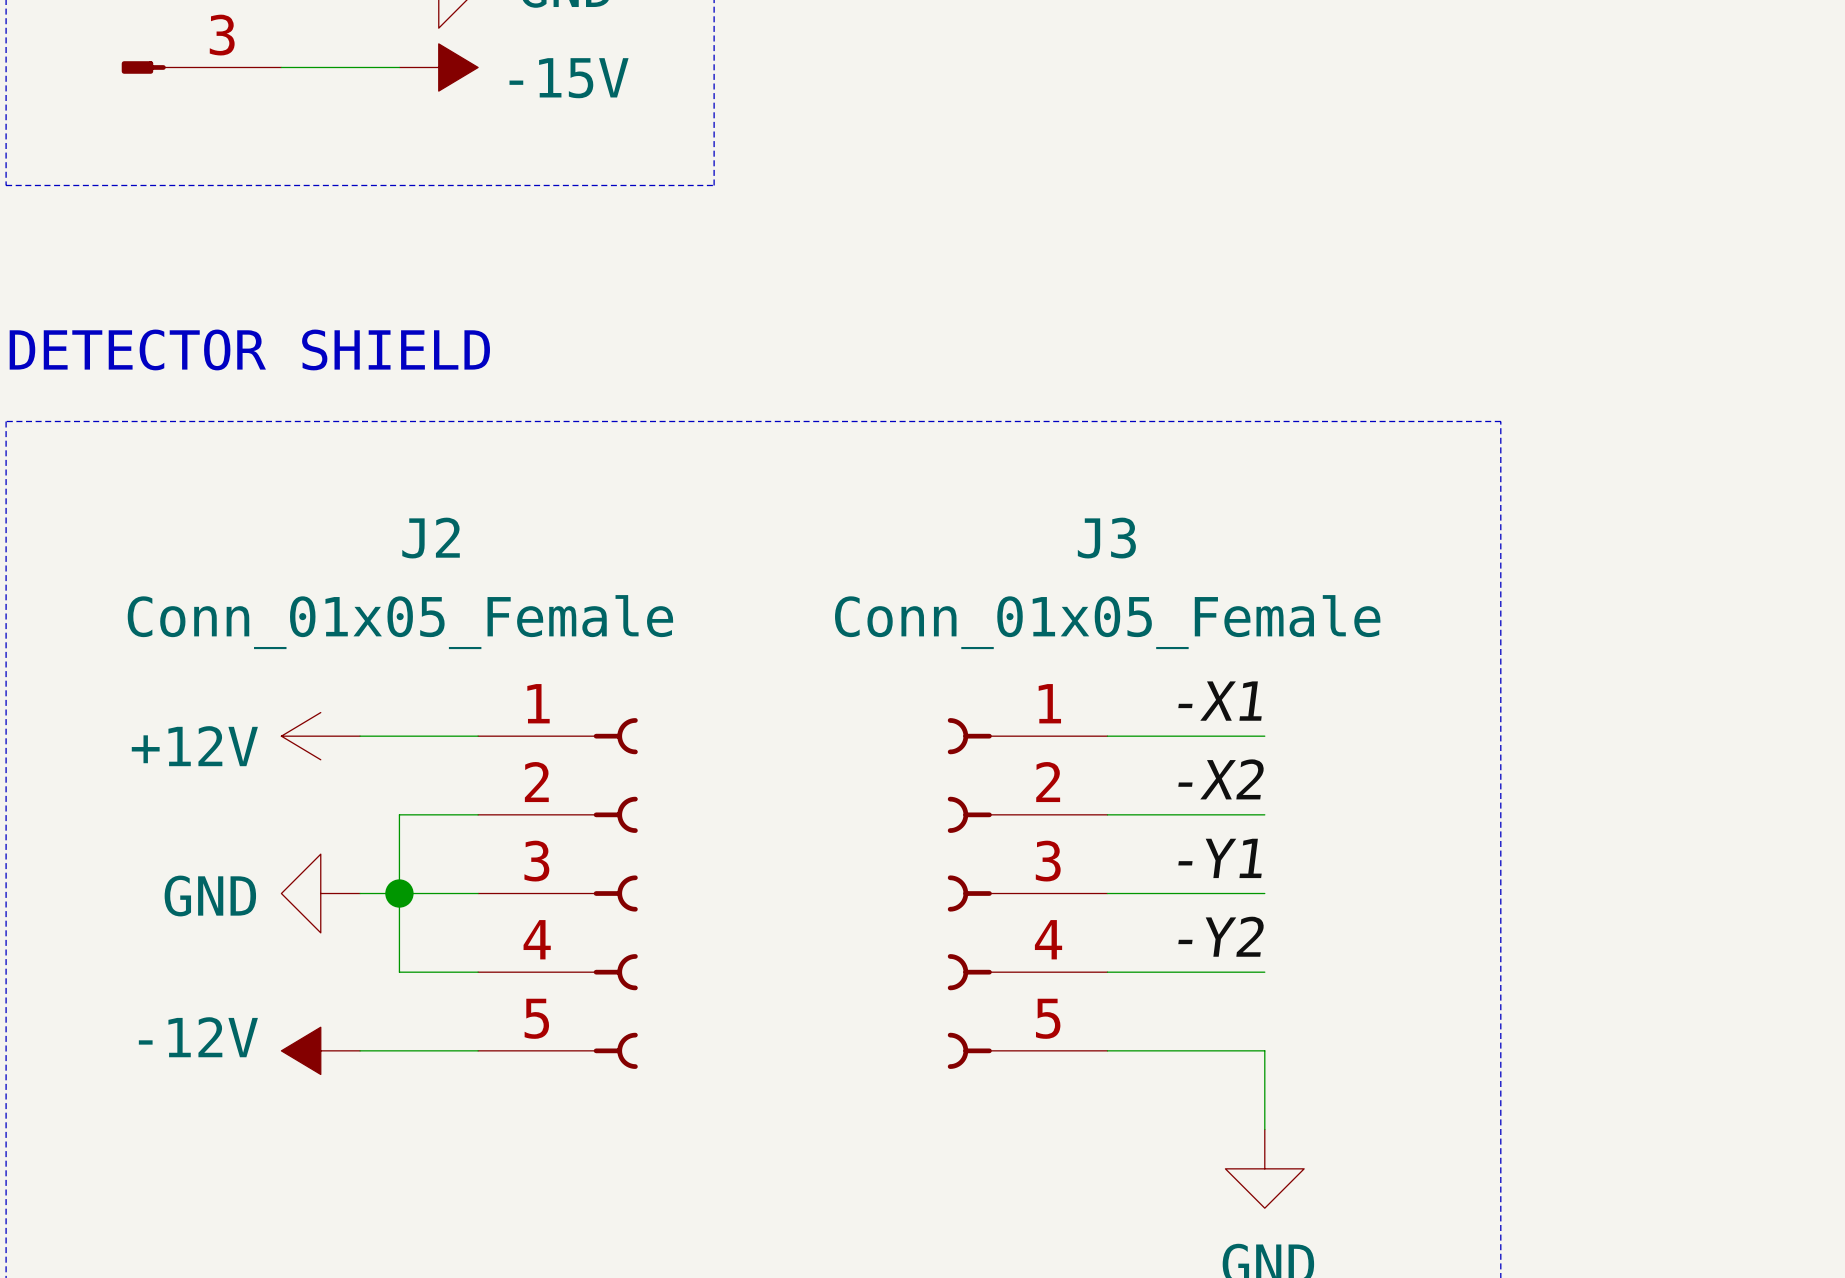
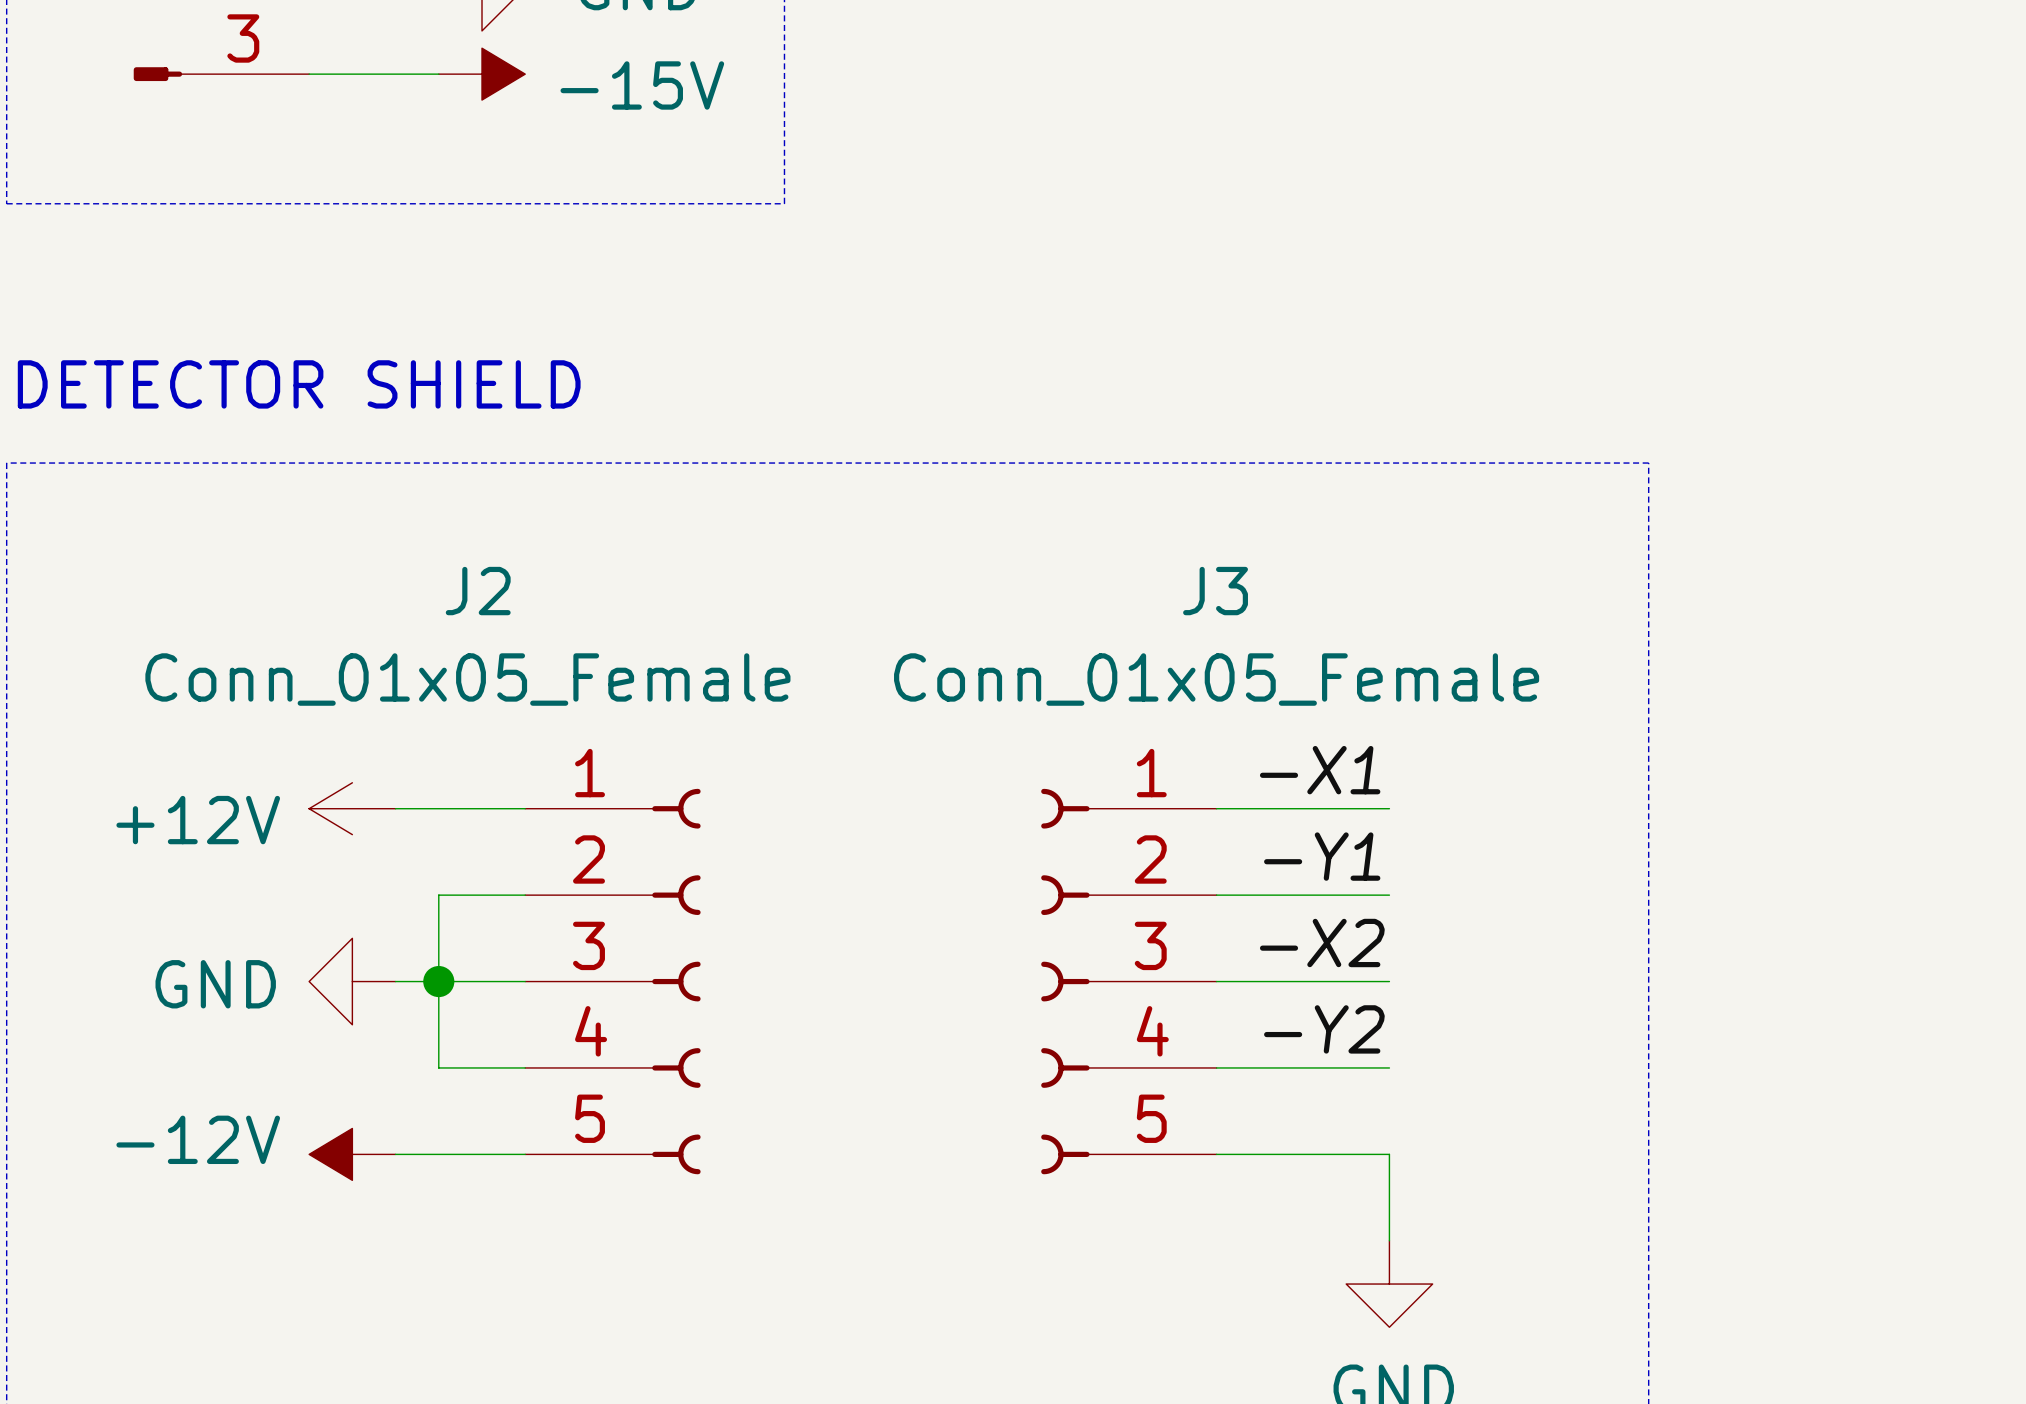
label: -X2 (1221, 779) -> -Y1 (1322, 856)
label: -Y1 (1220, 858) -> -X2 (1322, 942)

